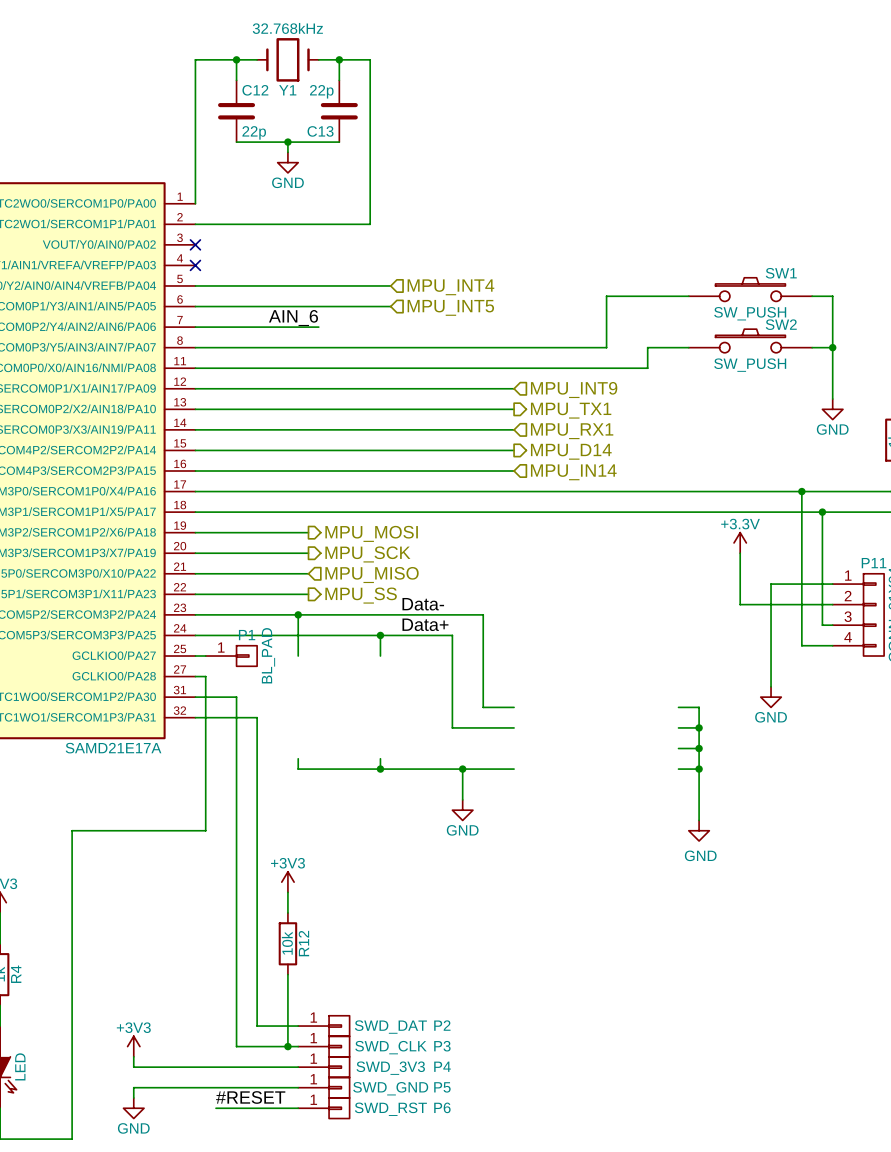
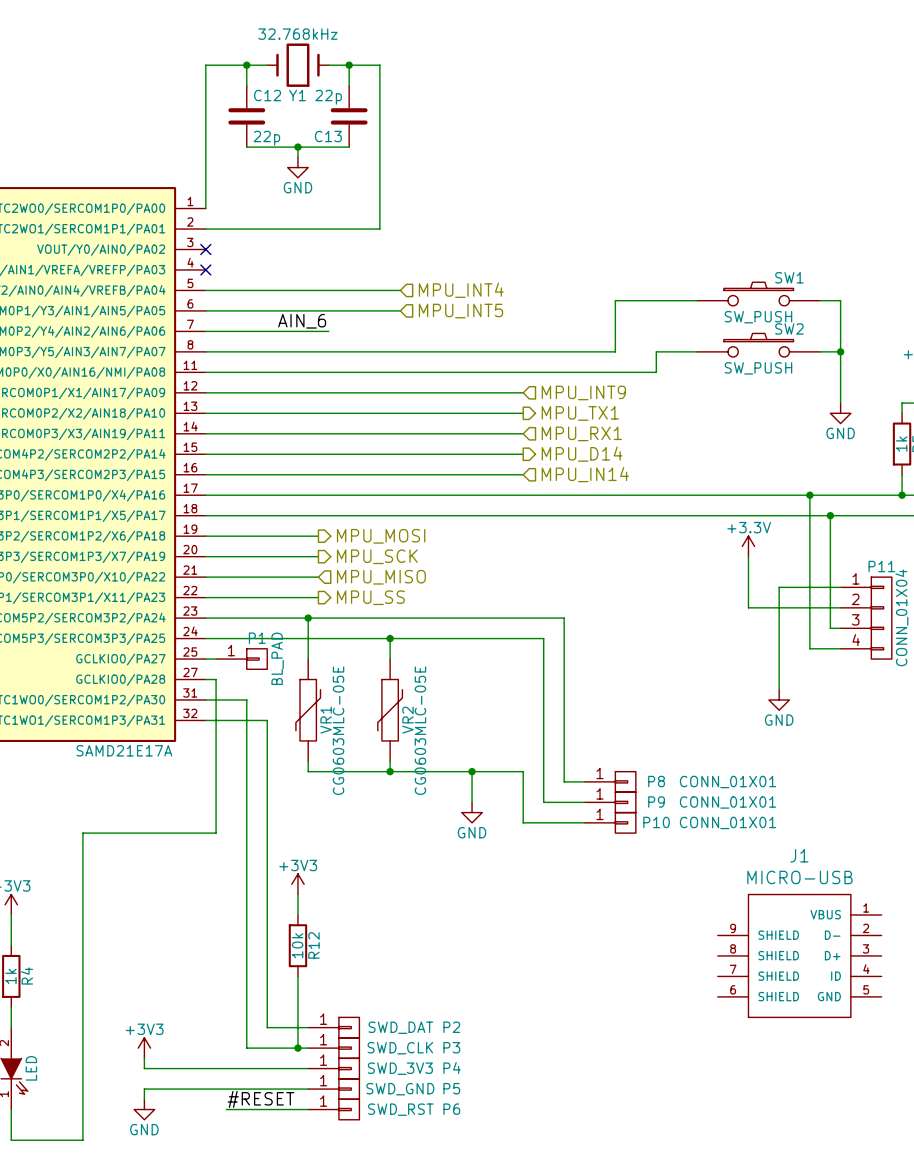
label: Data- (423, 604) -> none
wire: (483, 614) (483, 707) (514, 707) -> (492, 618) (564, 618) (564, 781) (584, 781)
label: Data+ (425, 624) -> none
wire: (452, 635) (452, 727) (514, 727) -> (461, 638) (543, 638) (543, 802) (584, 802)
VR1: none -> CG0603MLC-05E (308, 710)
VR2: none -> CG0603MLC-05E (390, 710)
wire: (678, 707) (699, 707) (699, 820) -> none
wire: (678, 727) (699, 727) -> none
junction: (699, 727) -> none
wire: (678, 748) (699, 748) -> none
junction: (699, 748) -> none
wire: none -> (523, 771) (523, 822) (584, 822)
wire: (678, 769) (699, 769) -> none
junction: (699, 769) -> none
P8: none -> CONN_01X01 (610, 781)
P9: none -> CONN_01X01 (610, 802)
P10: none -> CONN_01X01 (610, 822)
power symbol: GND (699, 830) -> none
J1: none -> MICRO-USB (799, 955)

